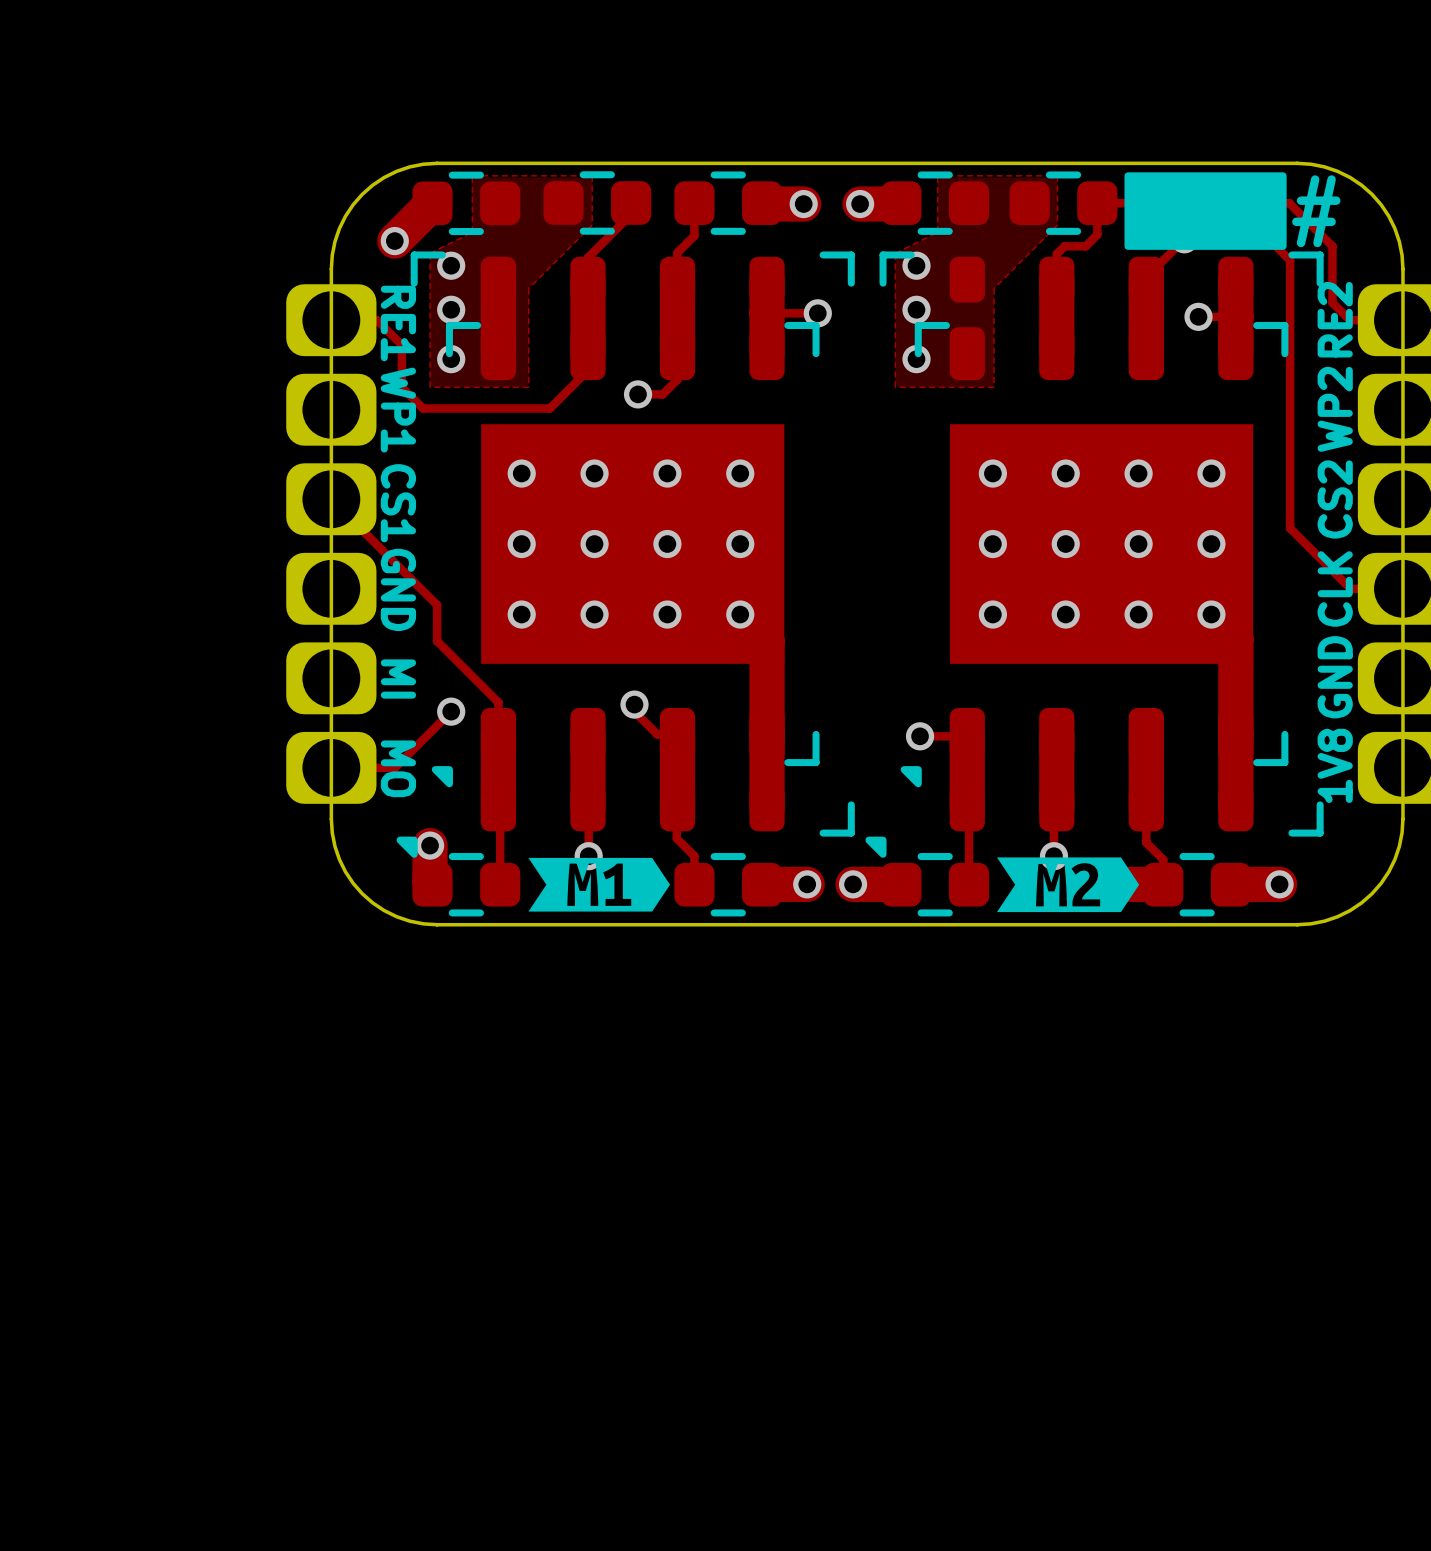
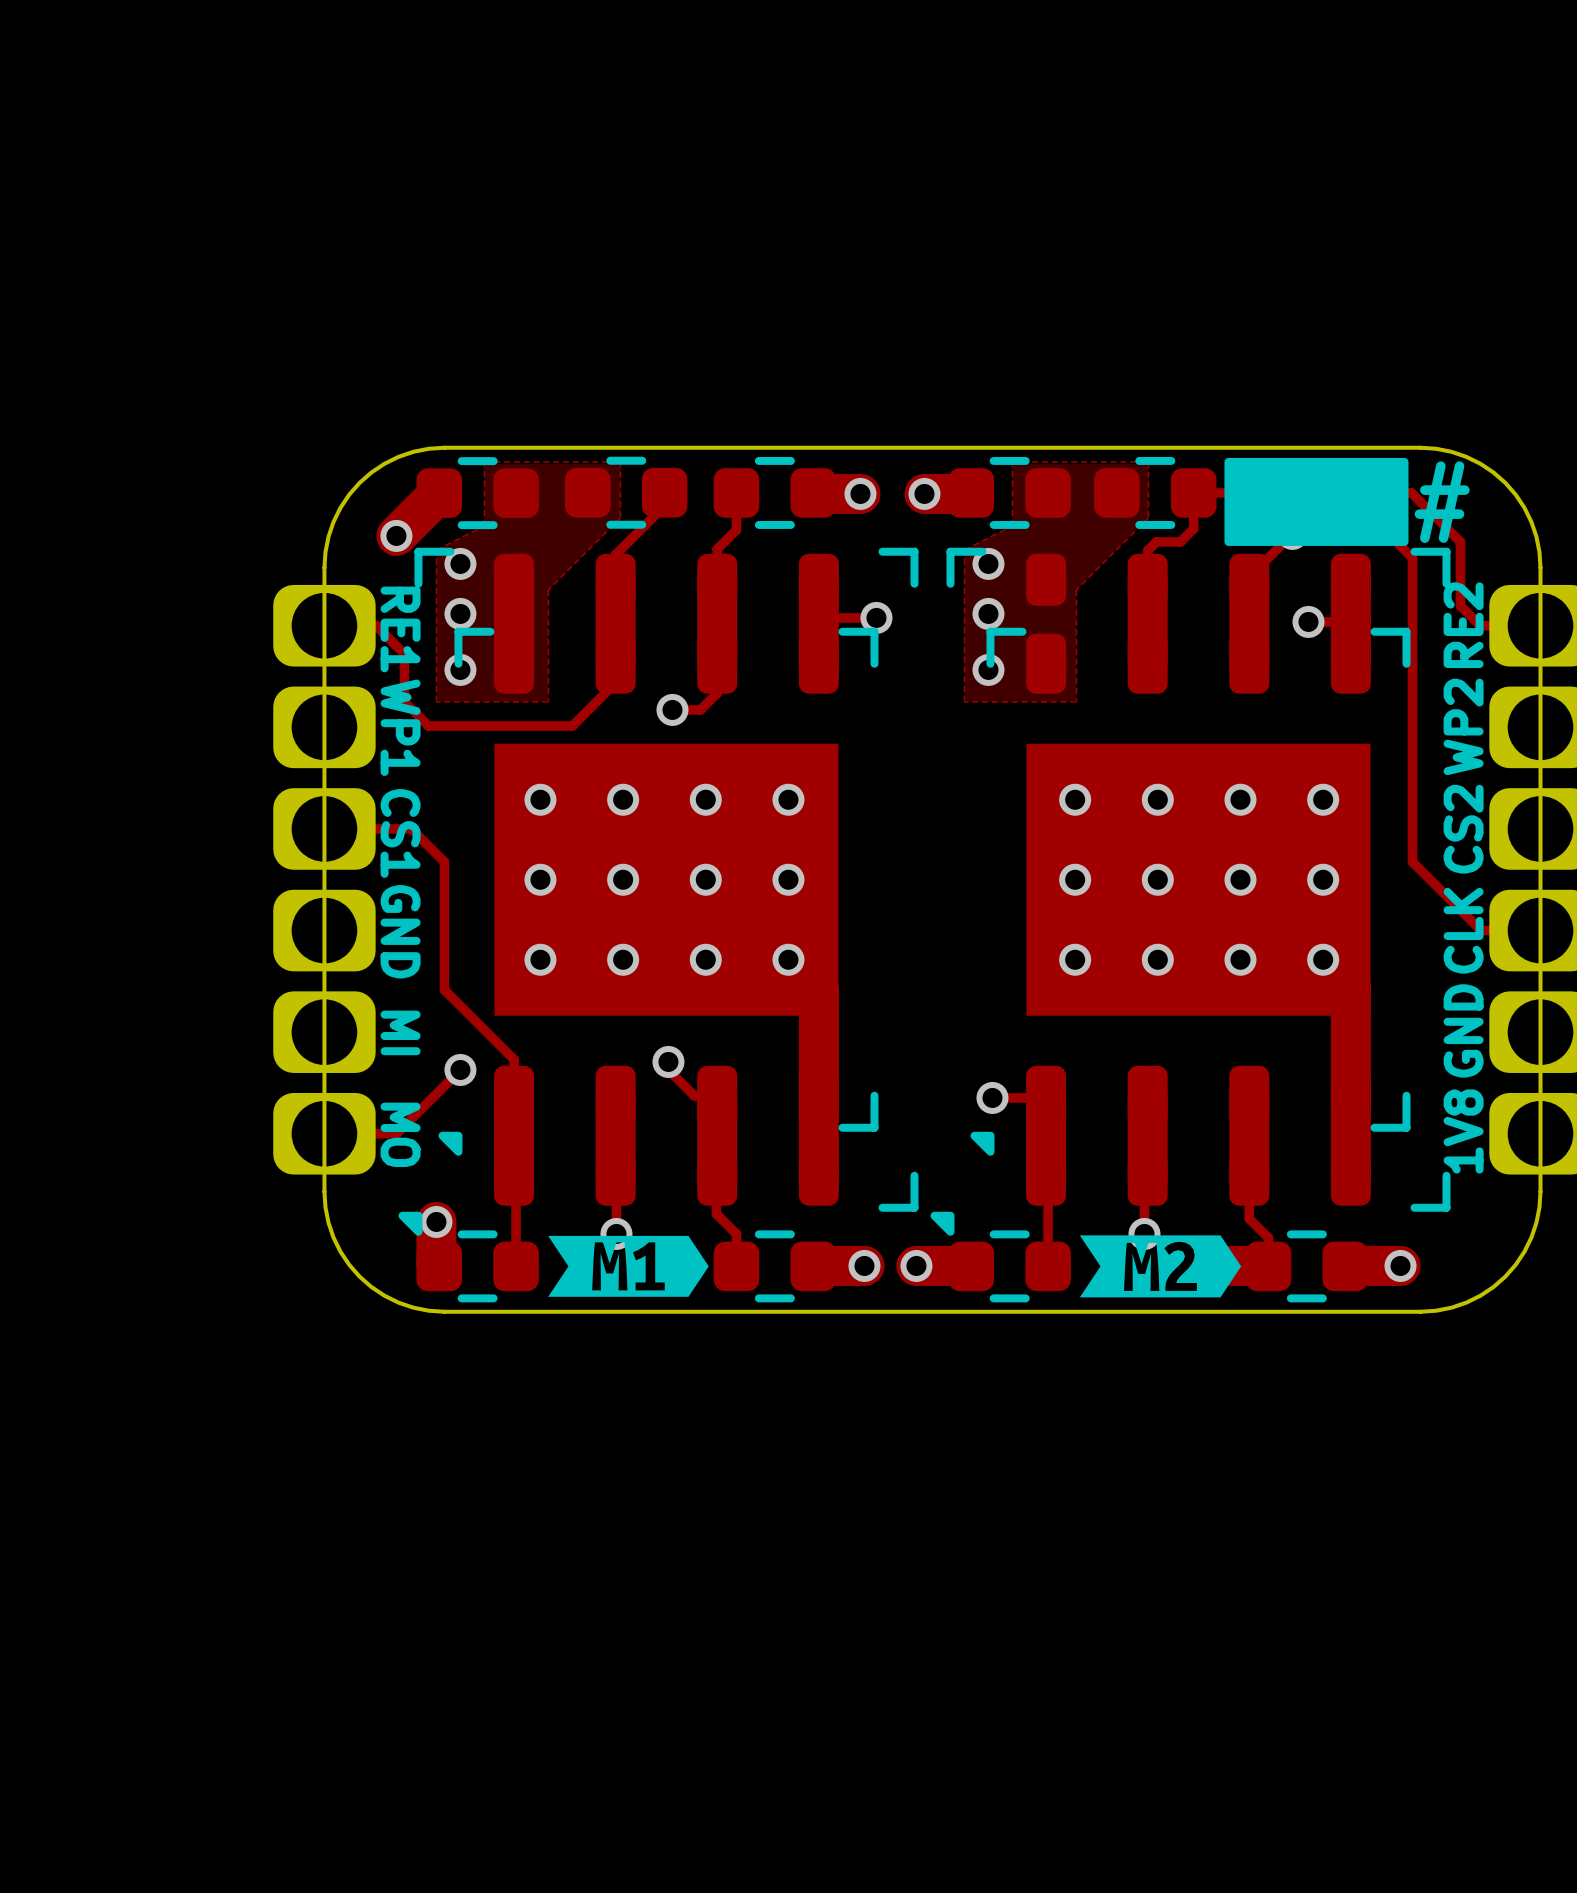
track: (331, 499) (437, 605) -> (324, 828) (411, 828) (444, 861) (444, 948)

